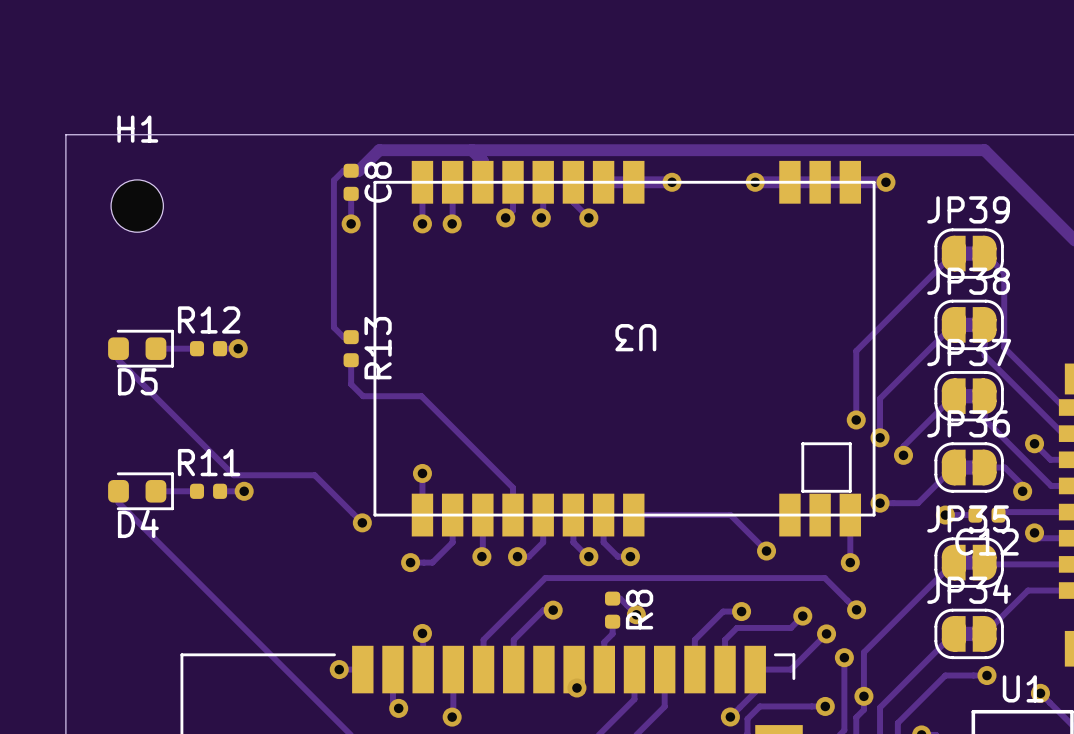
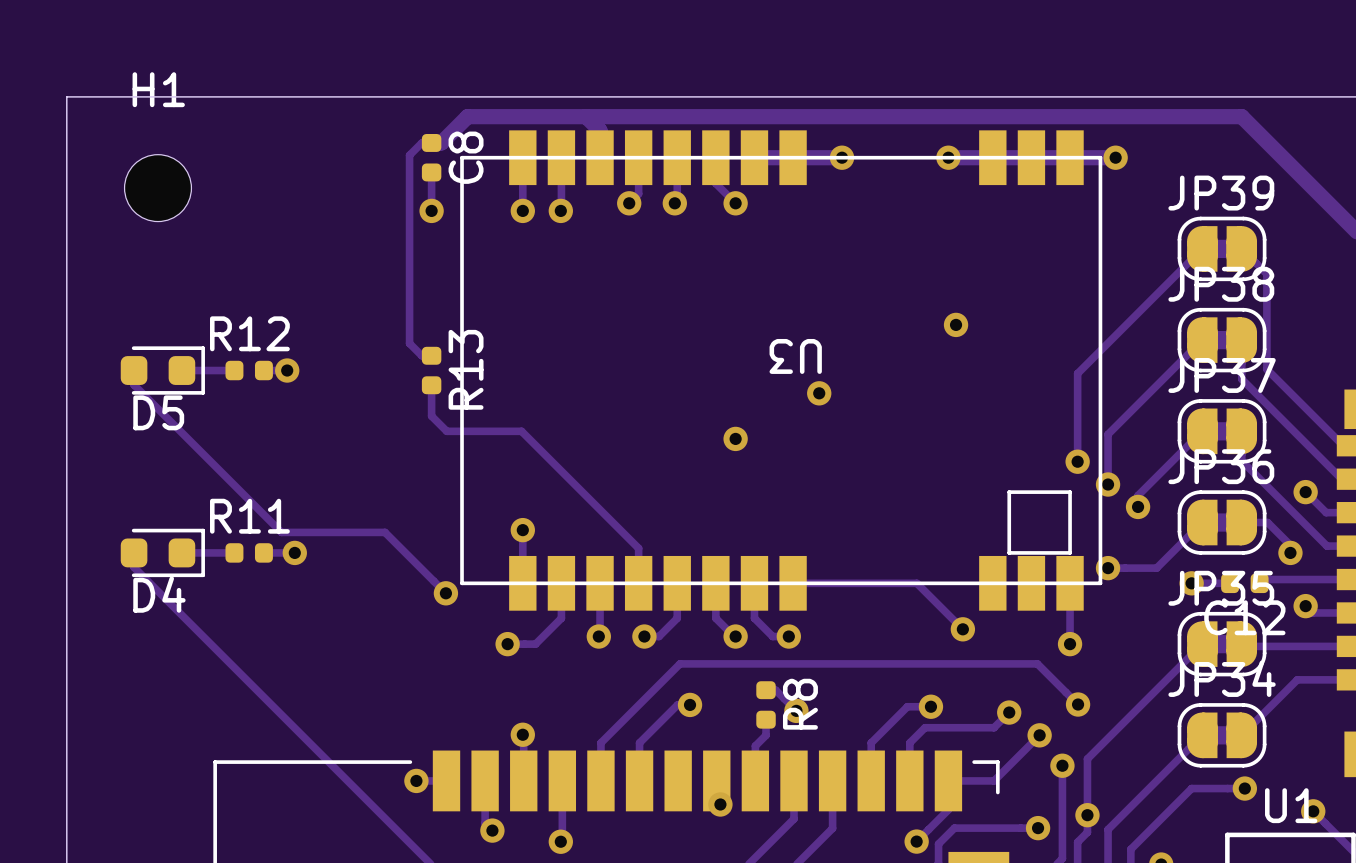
via: none -> (956, 324)
via: none -> (819, 393)
via: none -> (735, 438)

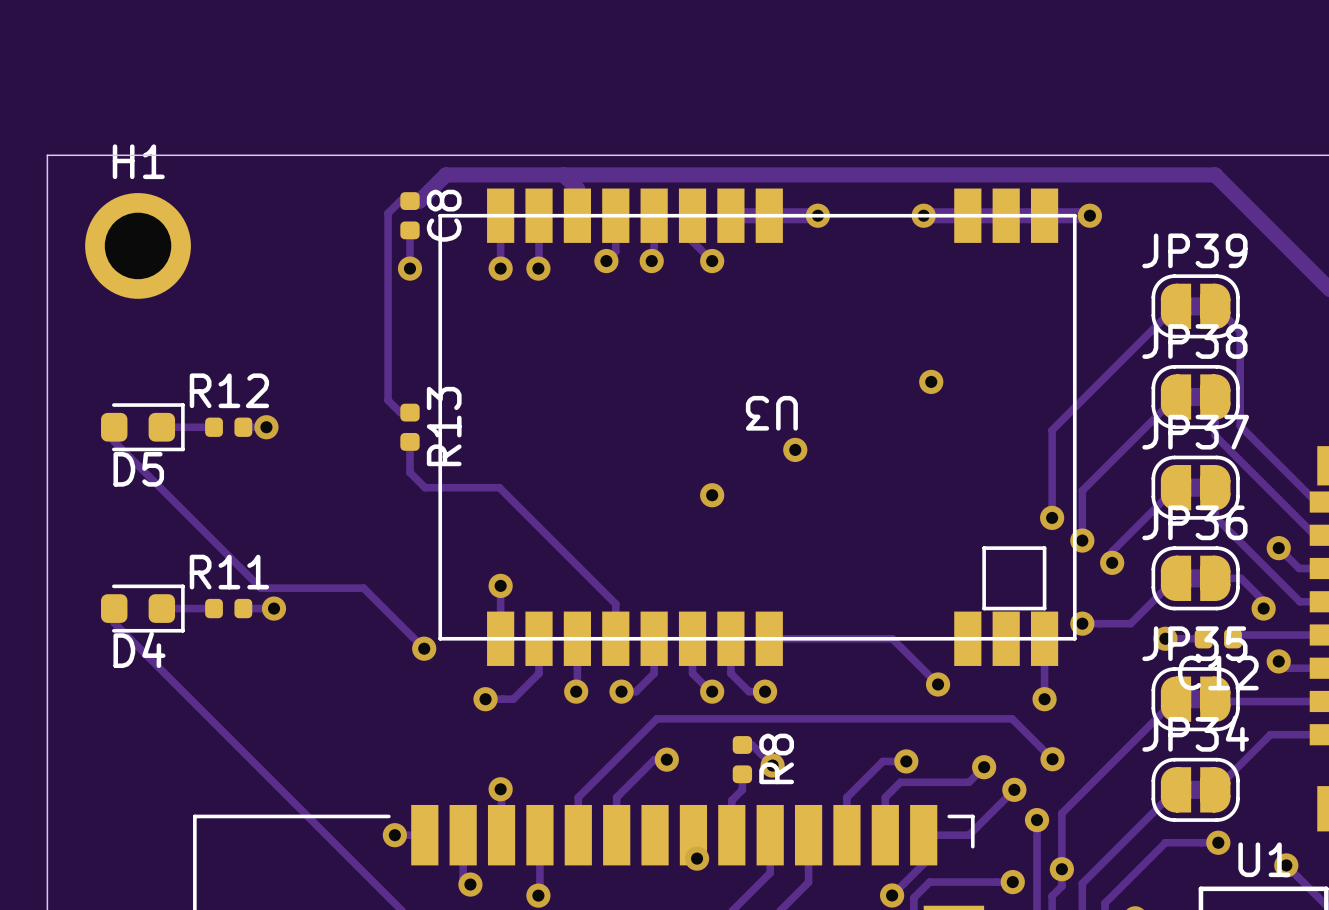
H1 footprint: [124, 154, 192, 222] -> [85, 193, 191, 299]

